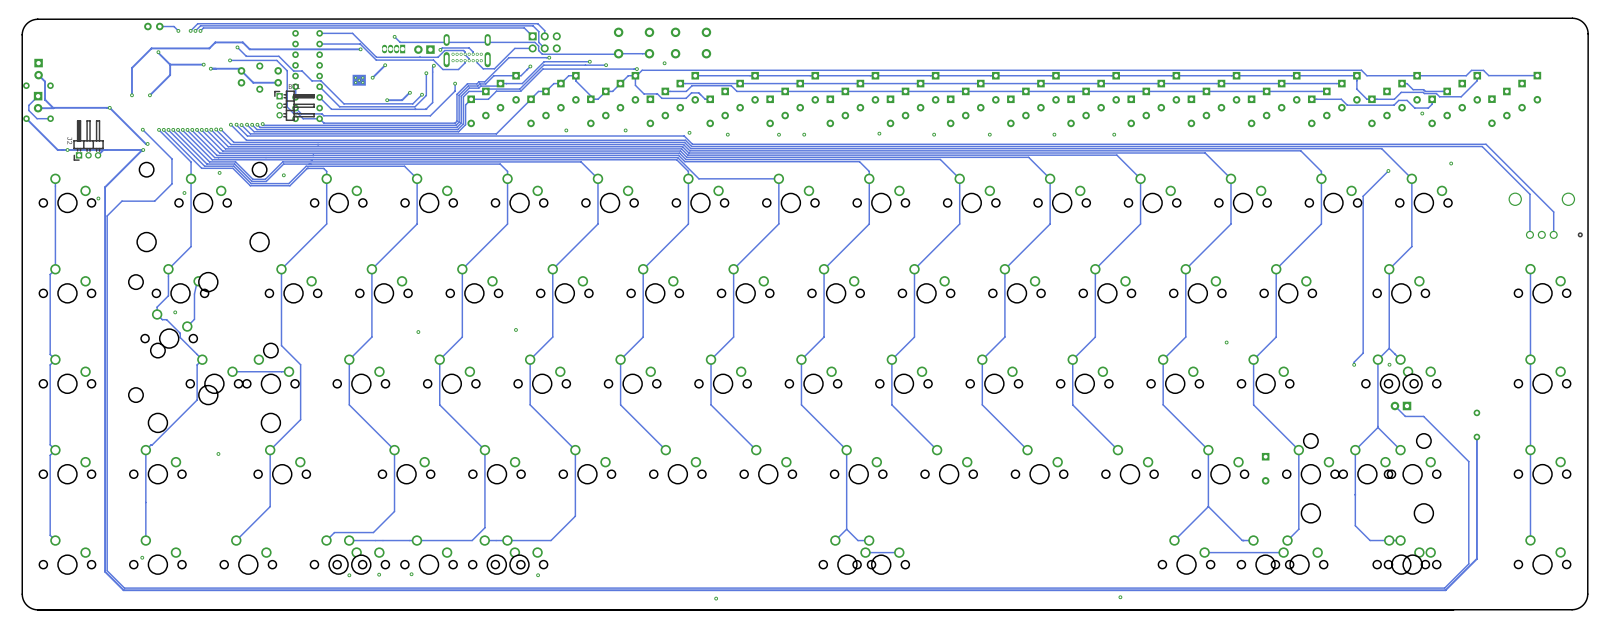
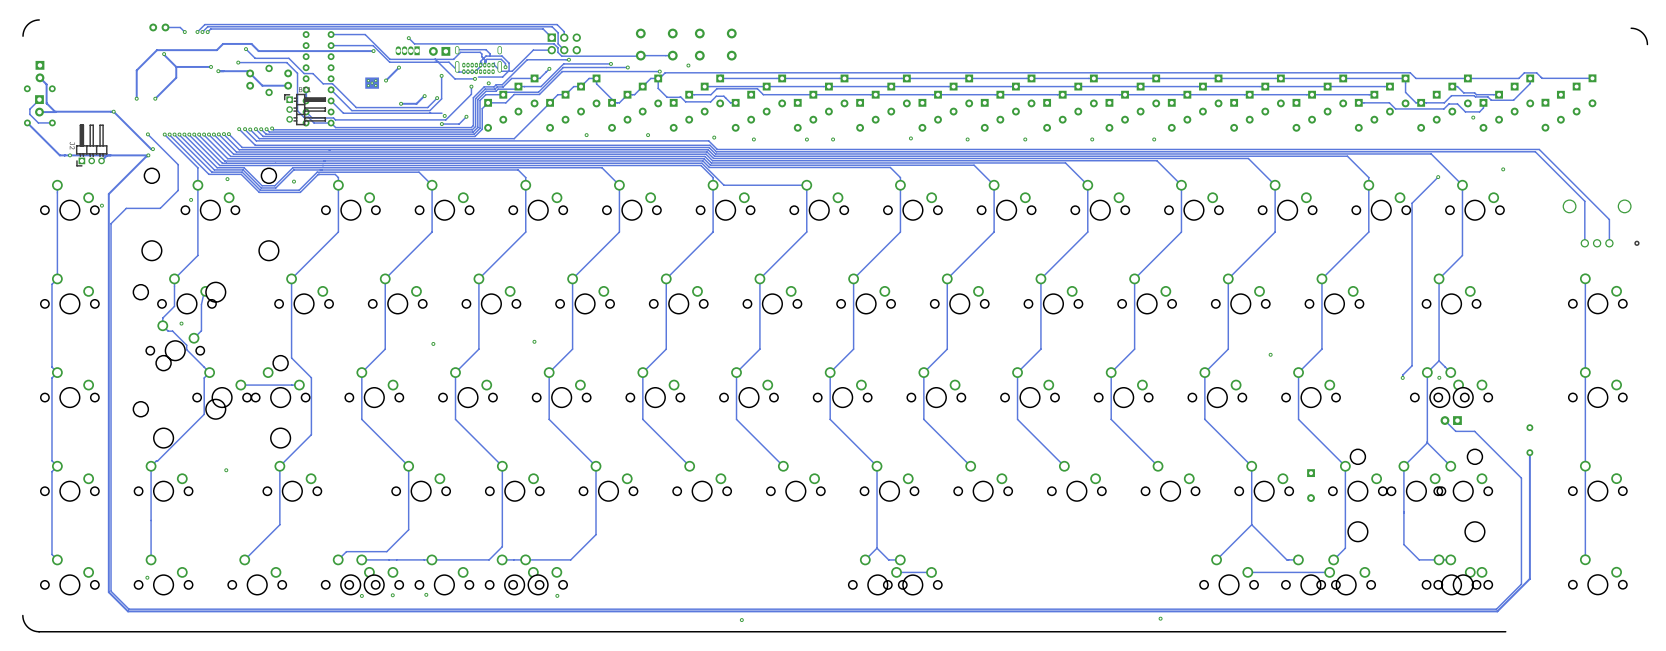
board edge: (37, 19) (1572, 18) (1583, 22) (1588, 33) -> none
board edge: none -> (1631, 28) (1642, 33) (1647, 44)
board edge: (1588, 33) (1587, 594) (1584, 603) (1578, 608) (37, 609) -> (22, 615) (27, 626) (39, 631)
board edge: (22, 34) (22, 594) (26, 605) (37, 609) -> none
via: (440, 49) -> none
part: (467, 50) -> none
track: none -> (435, 59) (454, 78) (474, 78)
part: none -> (478, 60)
track: none -> (480, 65) (480, 61) (485, 56) (502, 56) (509, 63) (509, 70) (502, 77) (478, 77)
track: none -> (484, 65) (486, 59) (501, 59) (505, 63) (505, 67)
via: none -> (505, 67)
track: (433, 65) (432, 102) (425, 109) -> none
via: (433, 65) -> none
via: none -> (474, 78)
via: none -> (488, 83)
via: none -> (444, 115)
track: none -> (466, 116) (459, 124) (441, 124)
via: none -> (466, 116)
via: none -> (441, 124)

